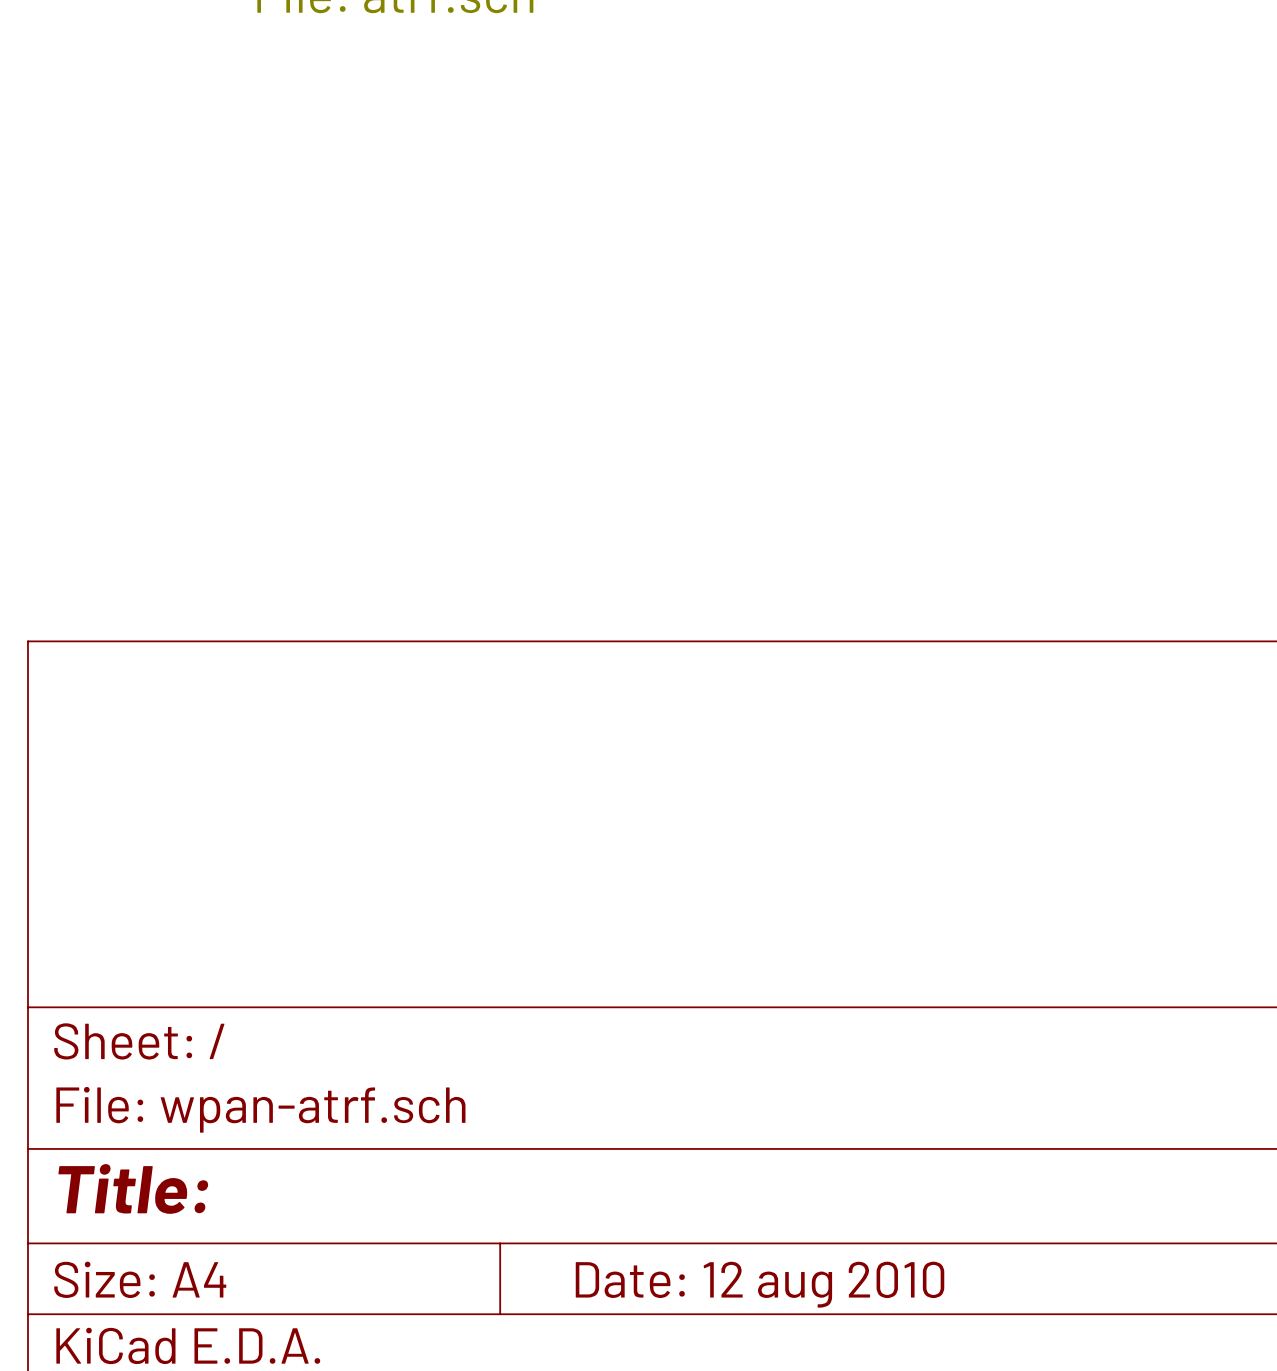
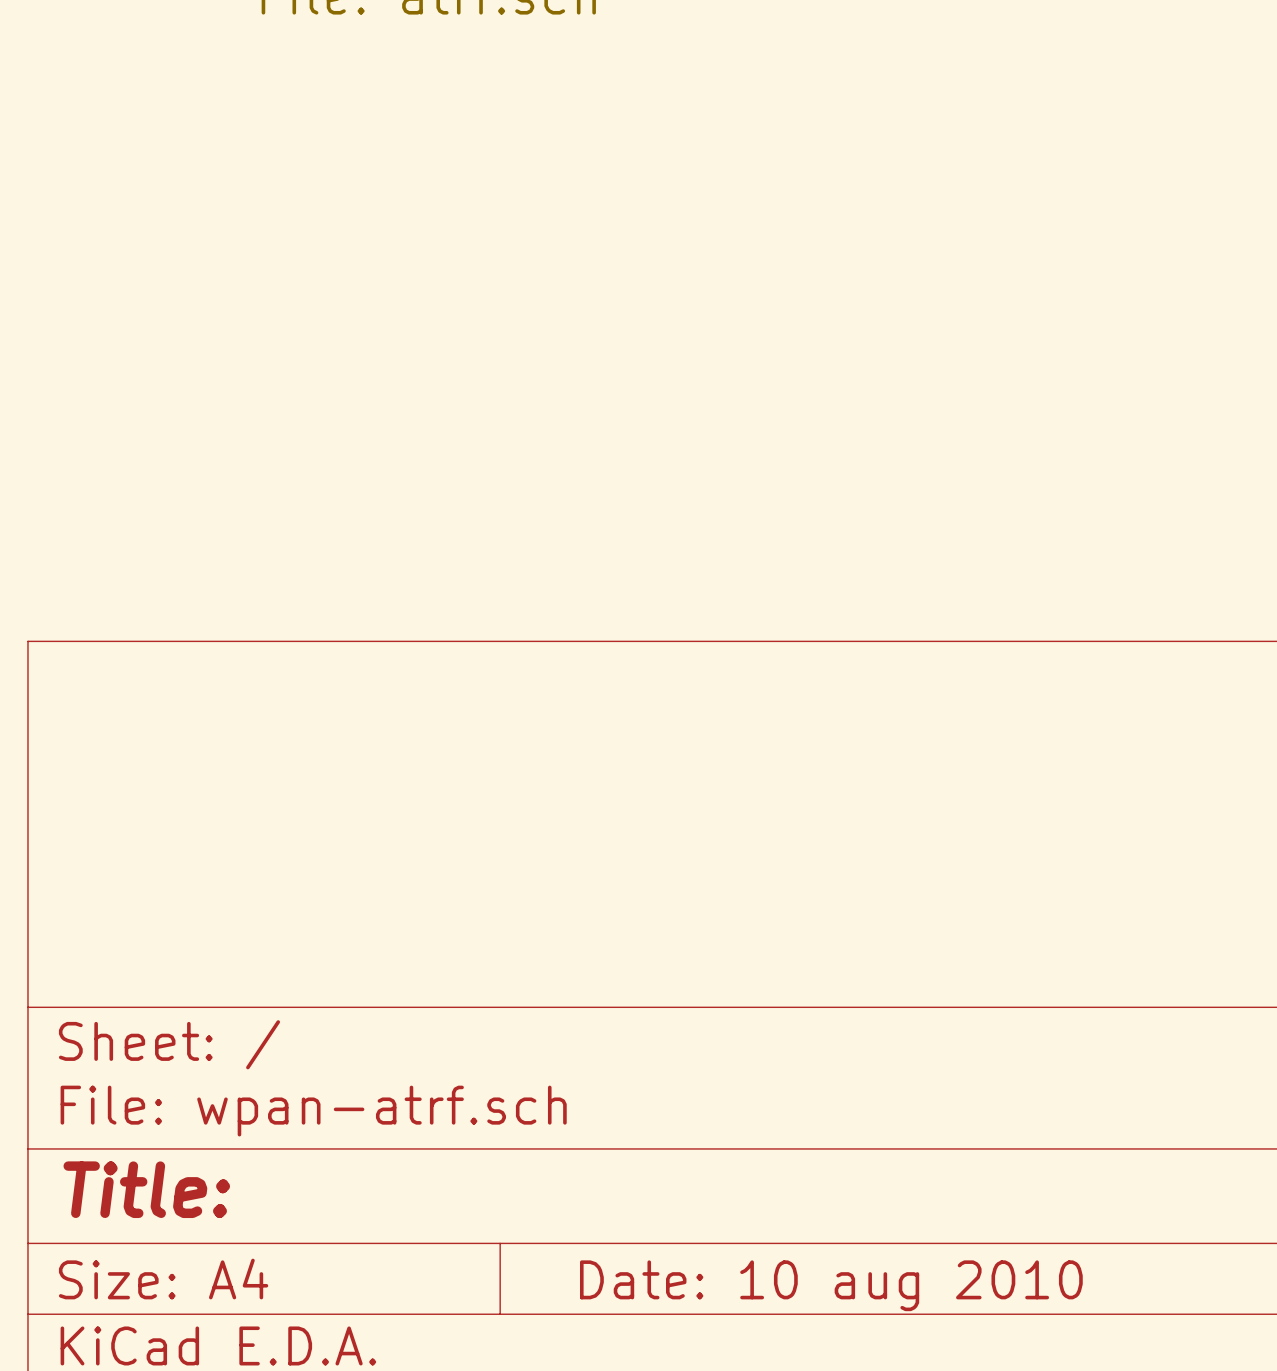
title block: Date: 12 aug 2010 (760, 1284) -> Date: 10 aug 2010 (831, 1285)

